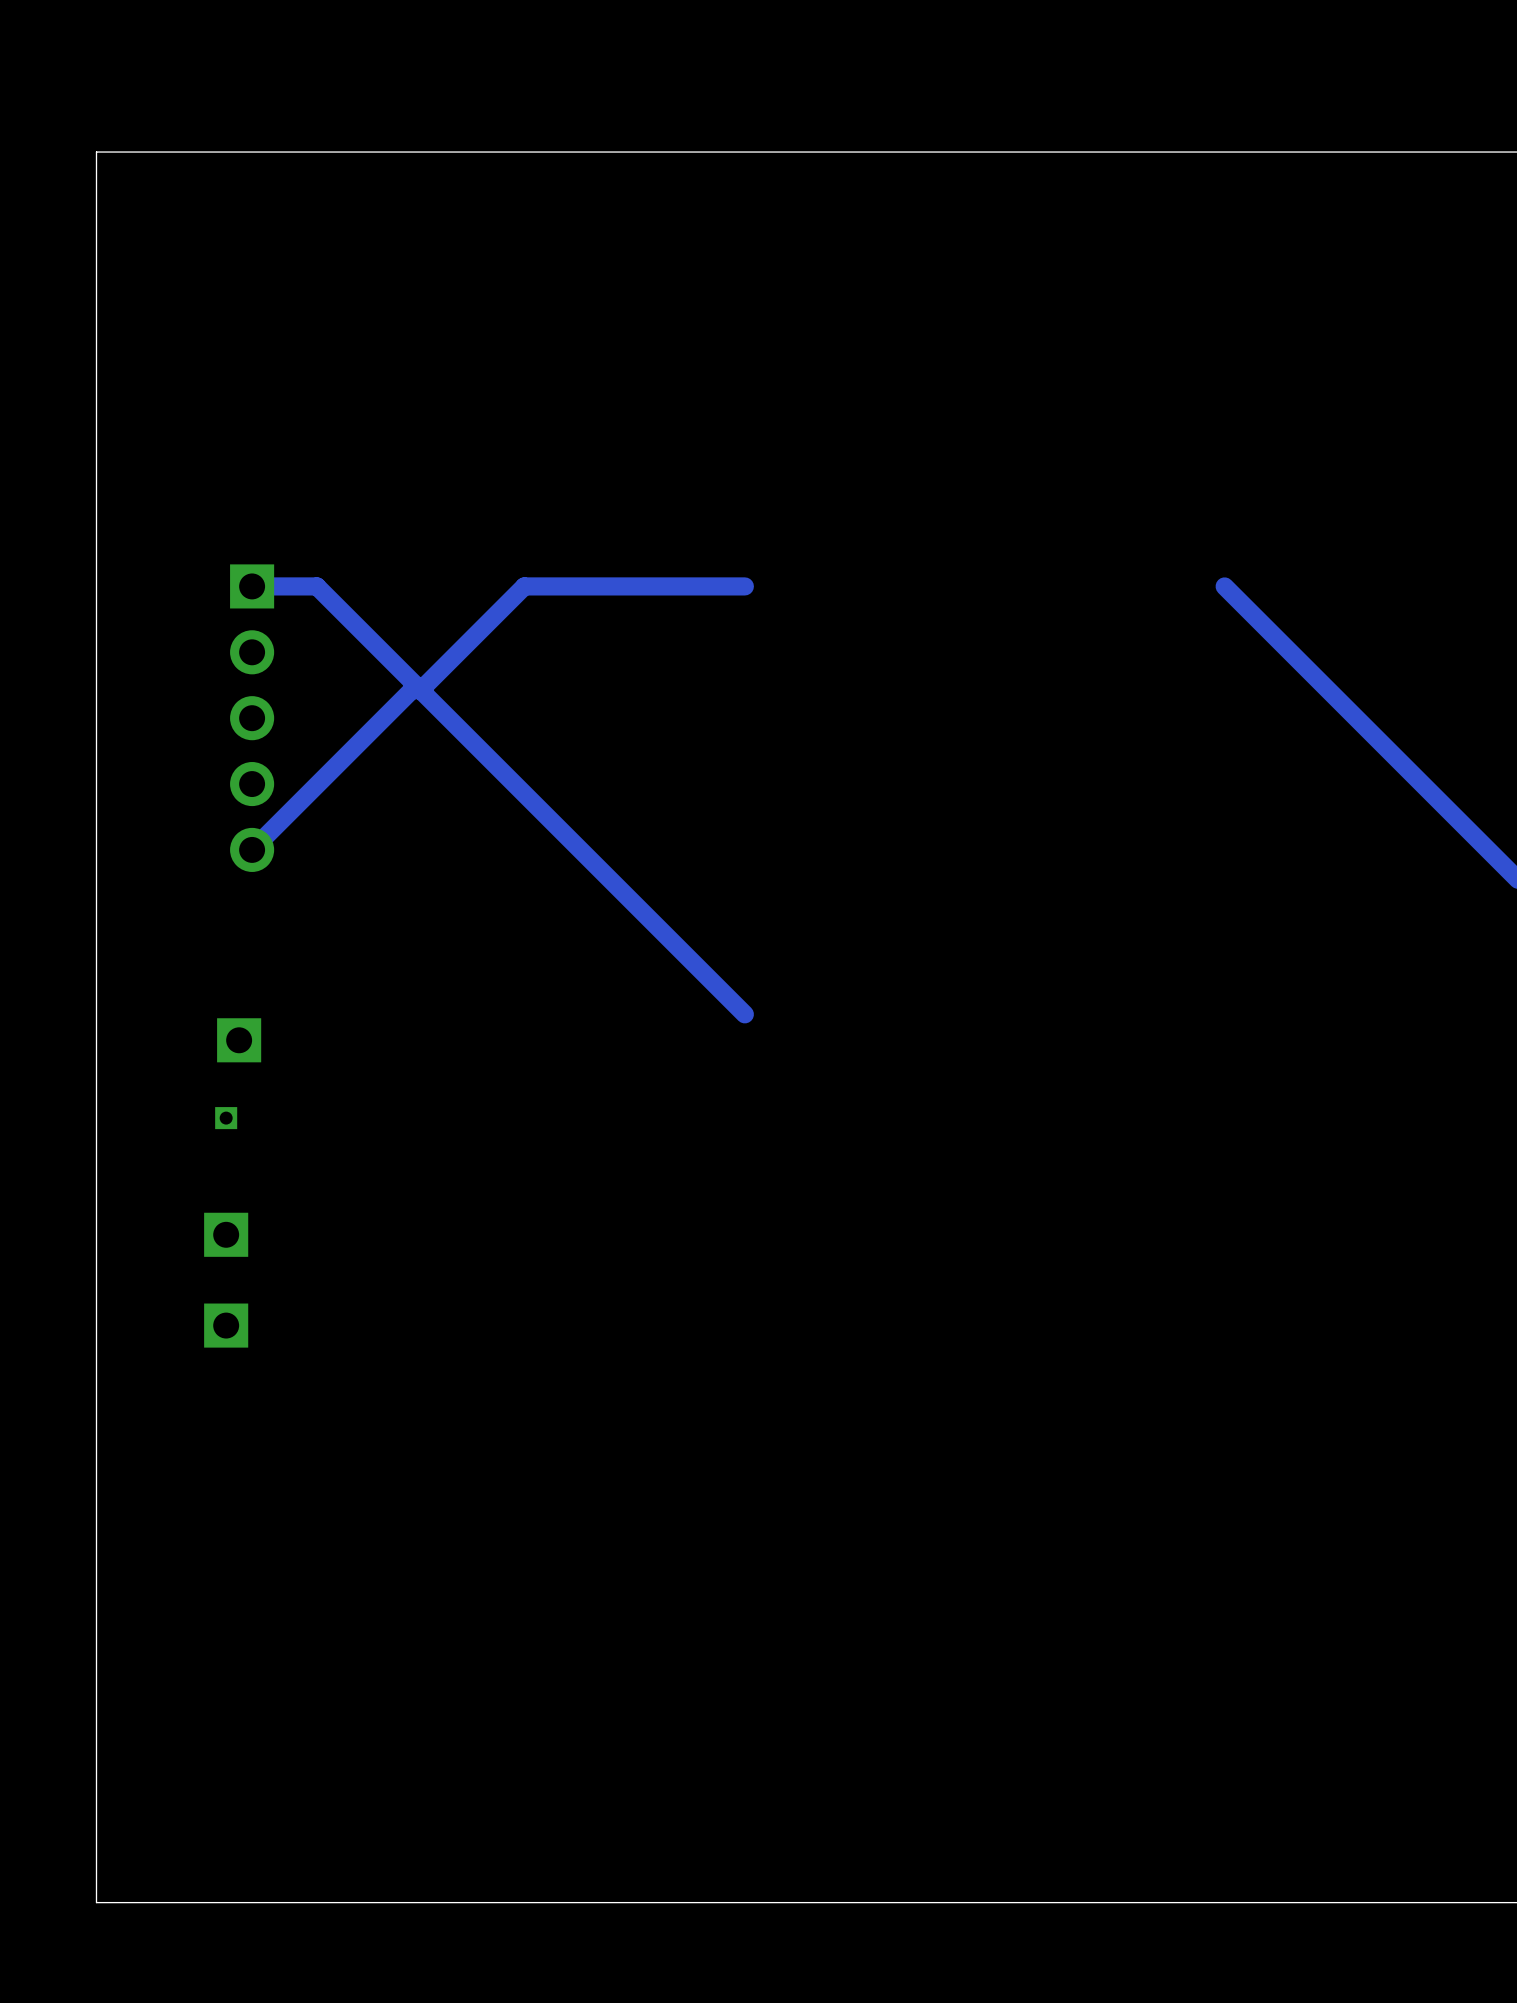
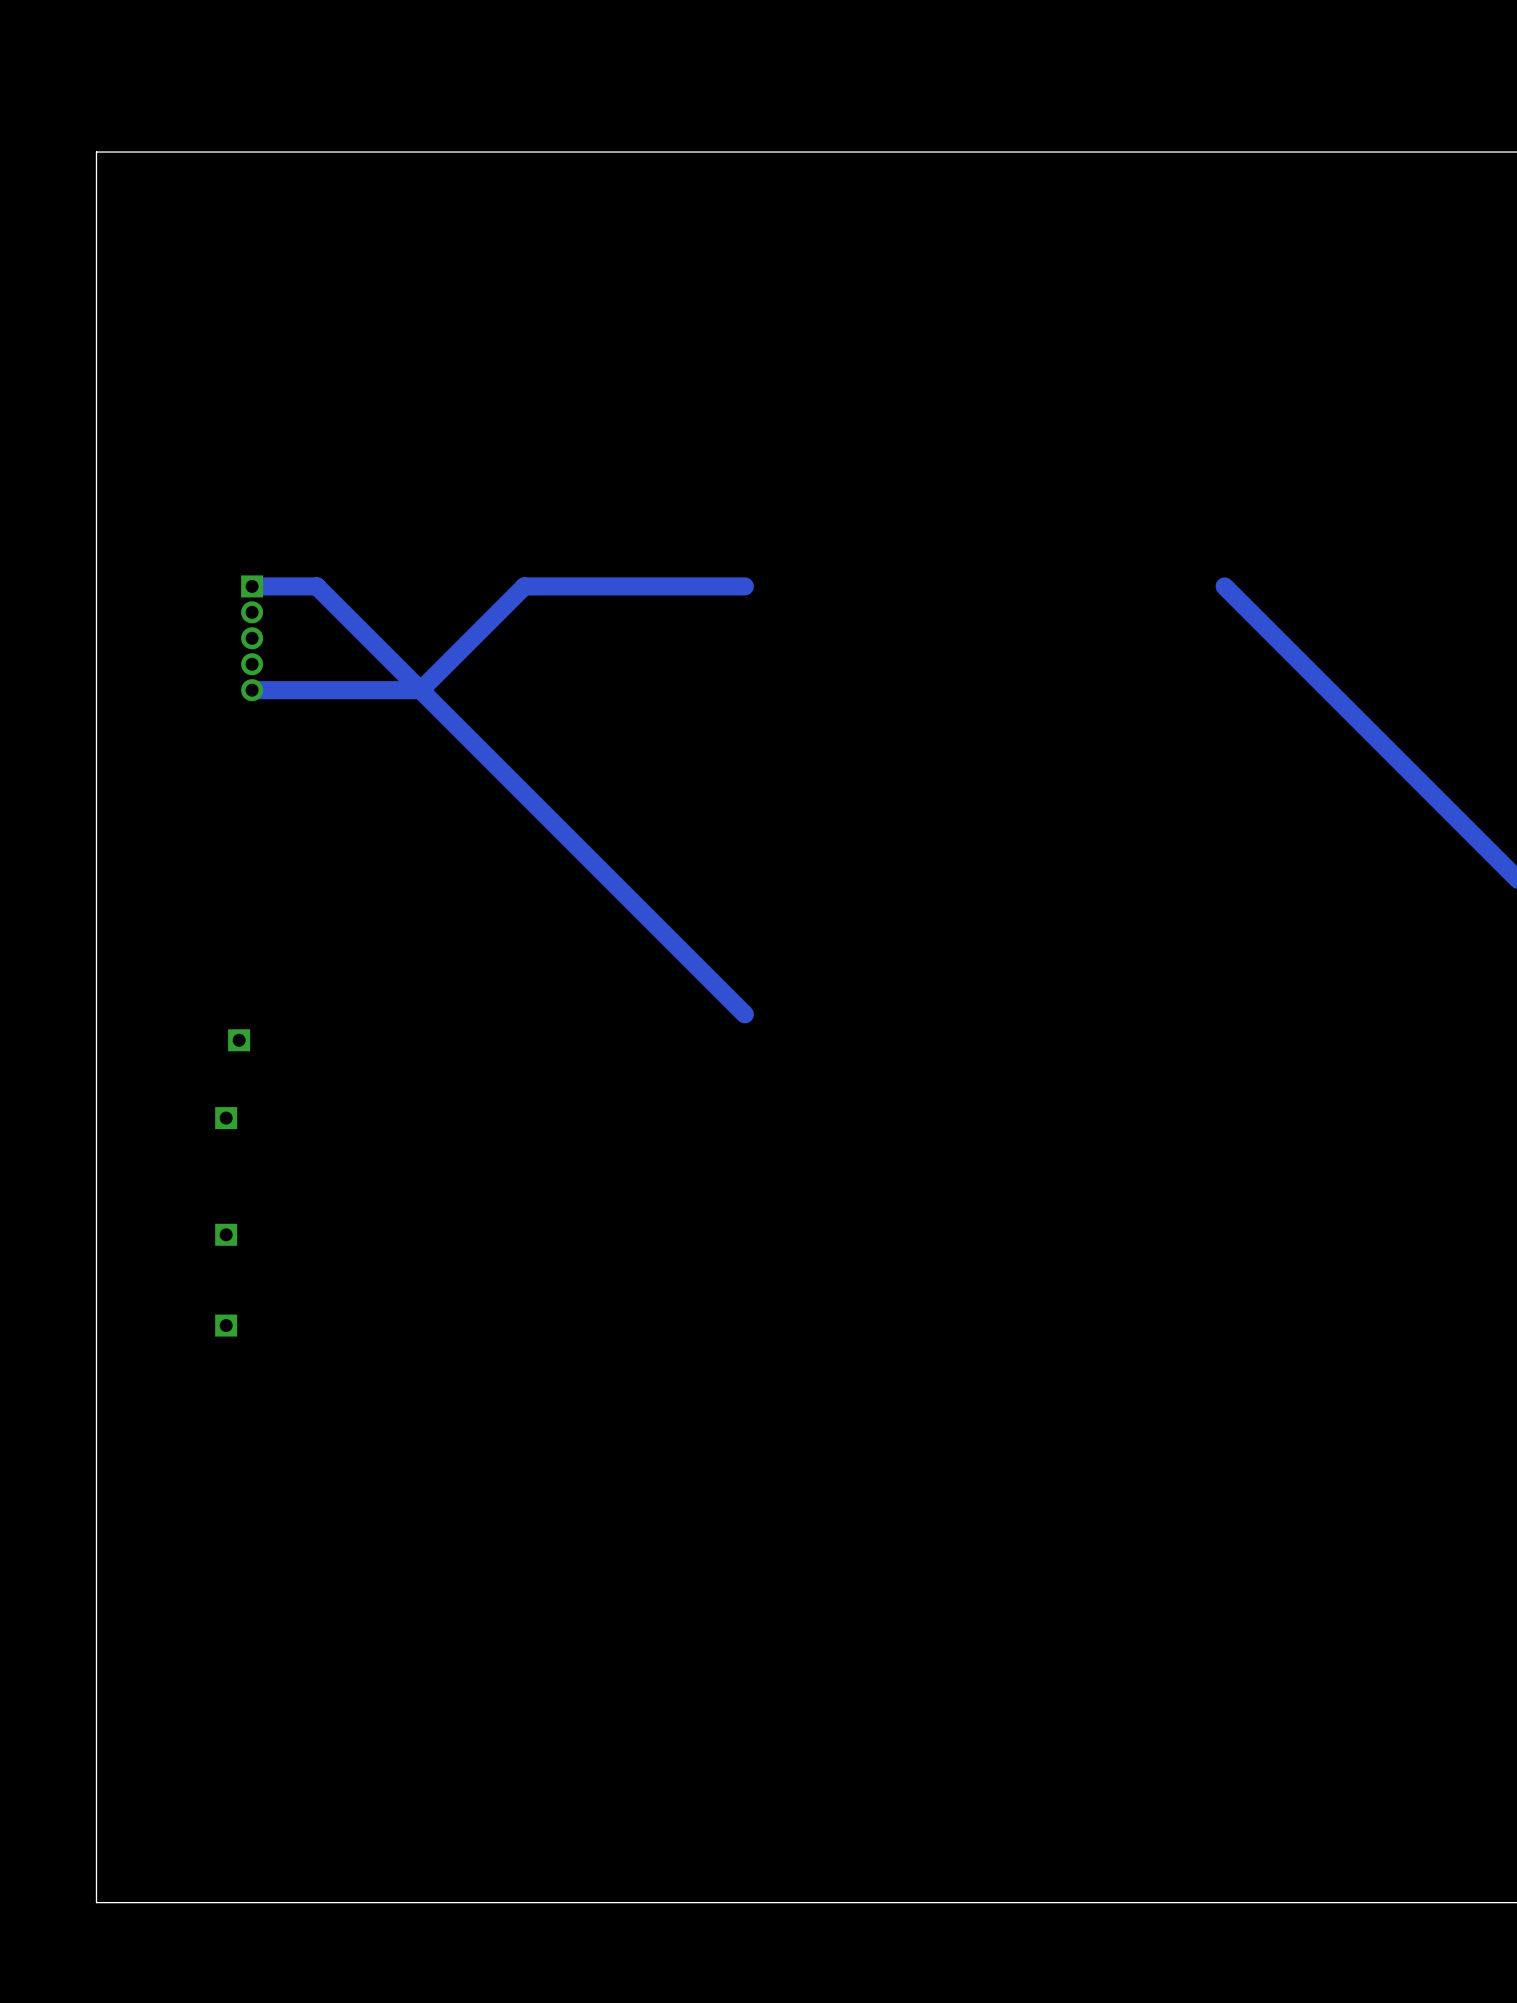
part: none -> (252, 638)
track: (411, 690) (252, 849) (260, 849) (265, 845) -> (411, 690) (252, 690)
part: (252, 718) -> none
part footprint: [217, 1018, 262, 1063] -> [228, 1029, 251, 1052]
part footprint: [204, 1212, 249, 1257] -> [215, 1223, 238, 1246]
part footprint: [204, 1303, 249, 1348] -> [215, 1314, 238, 1337]

